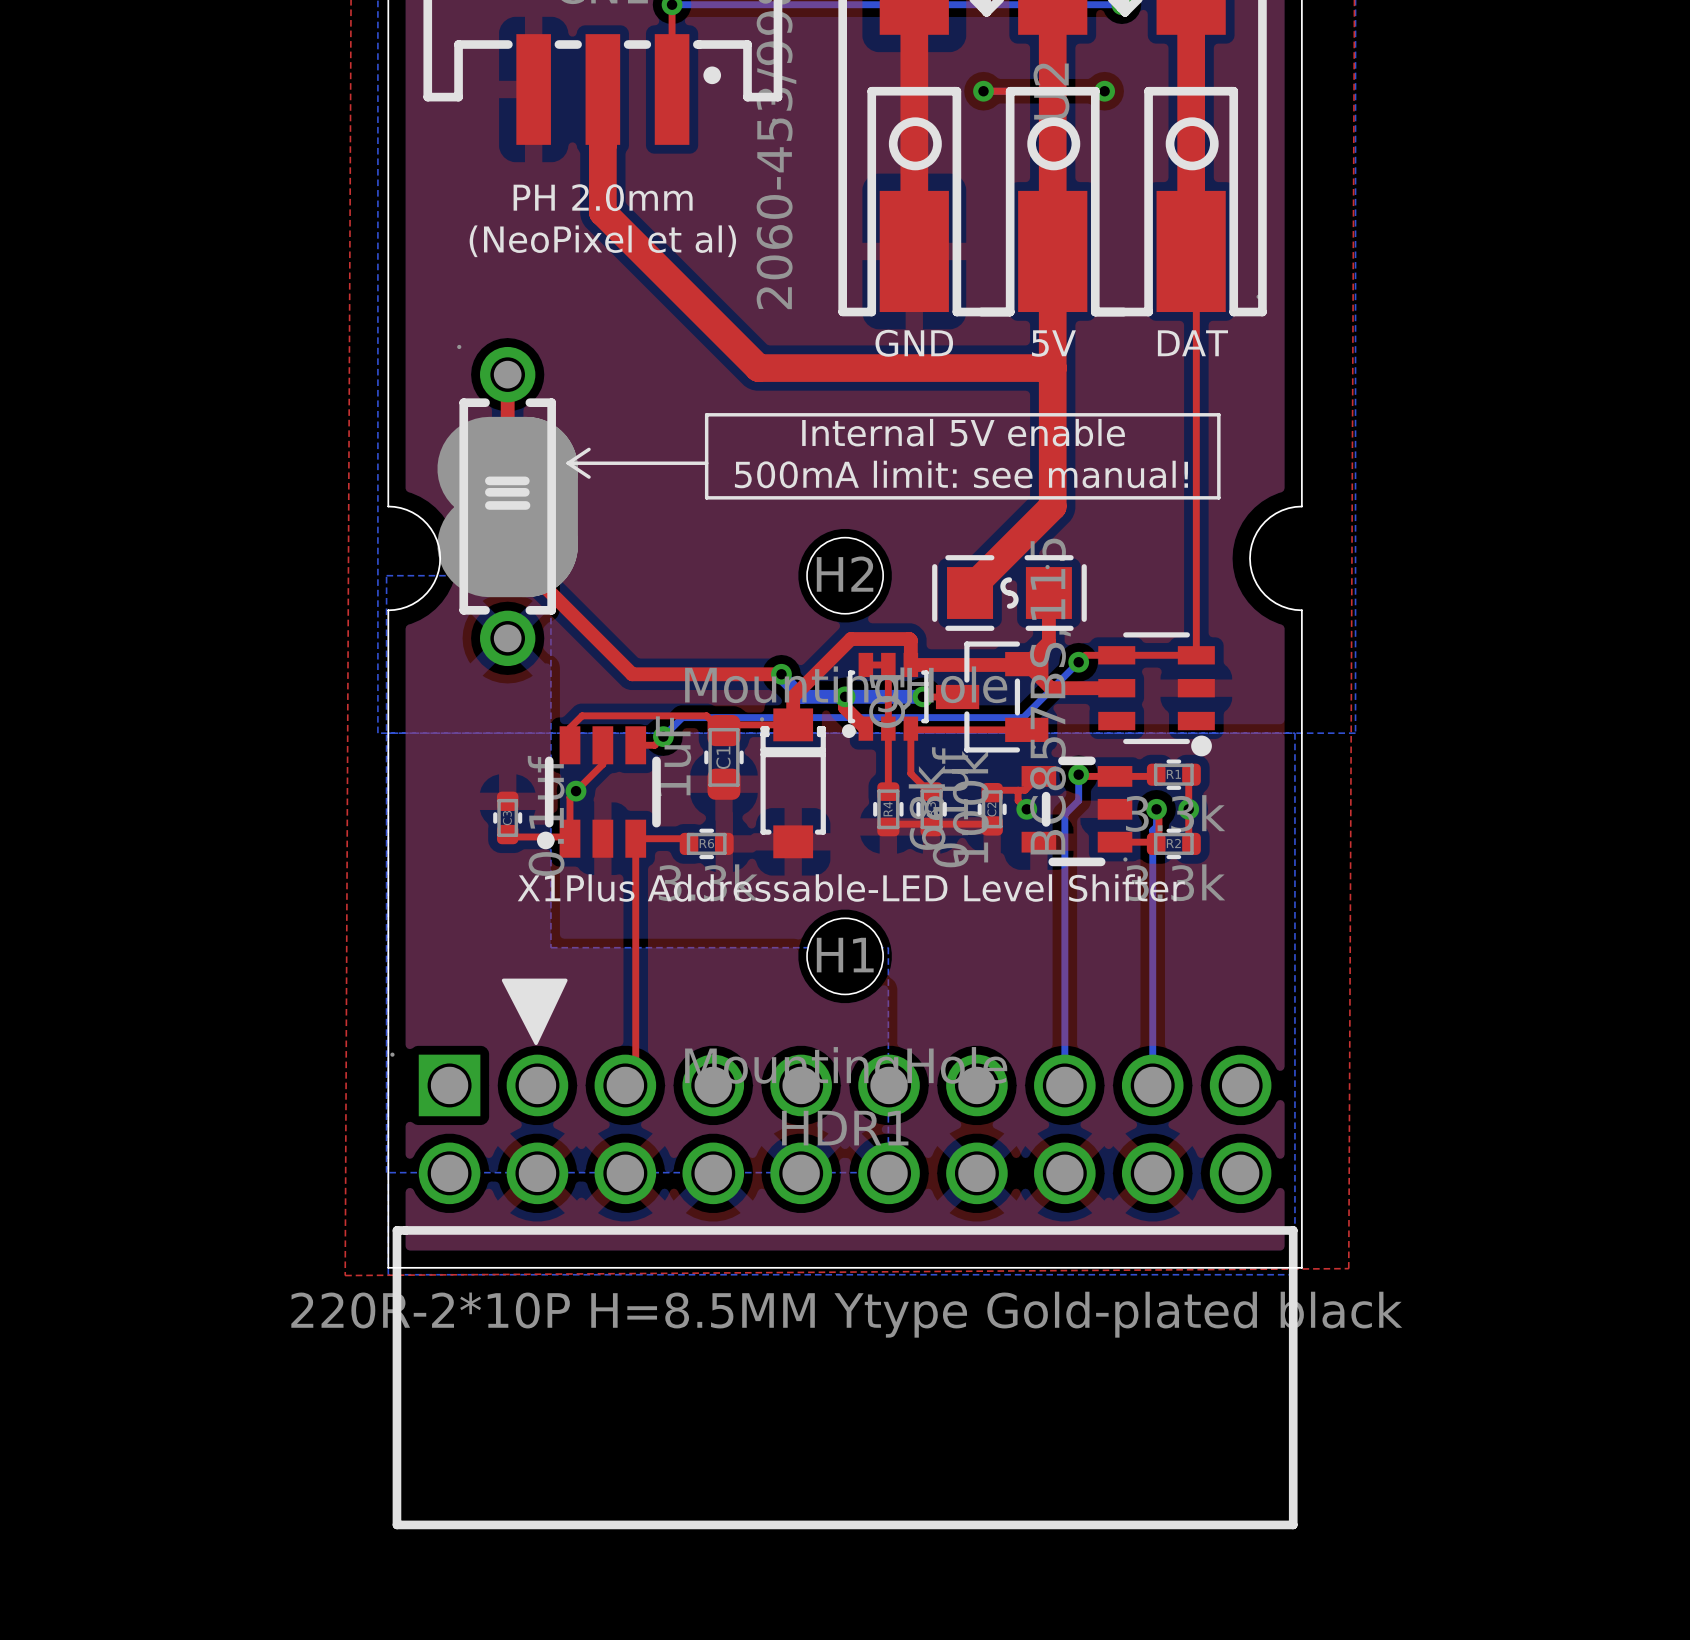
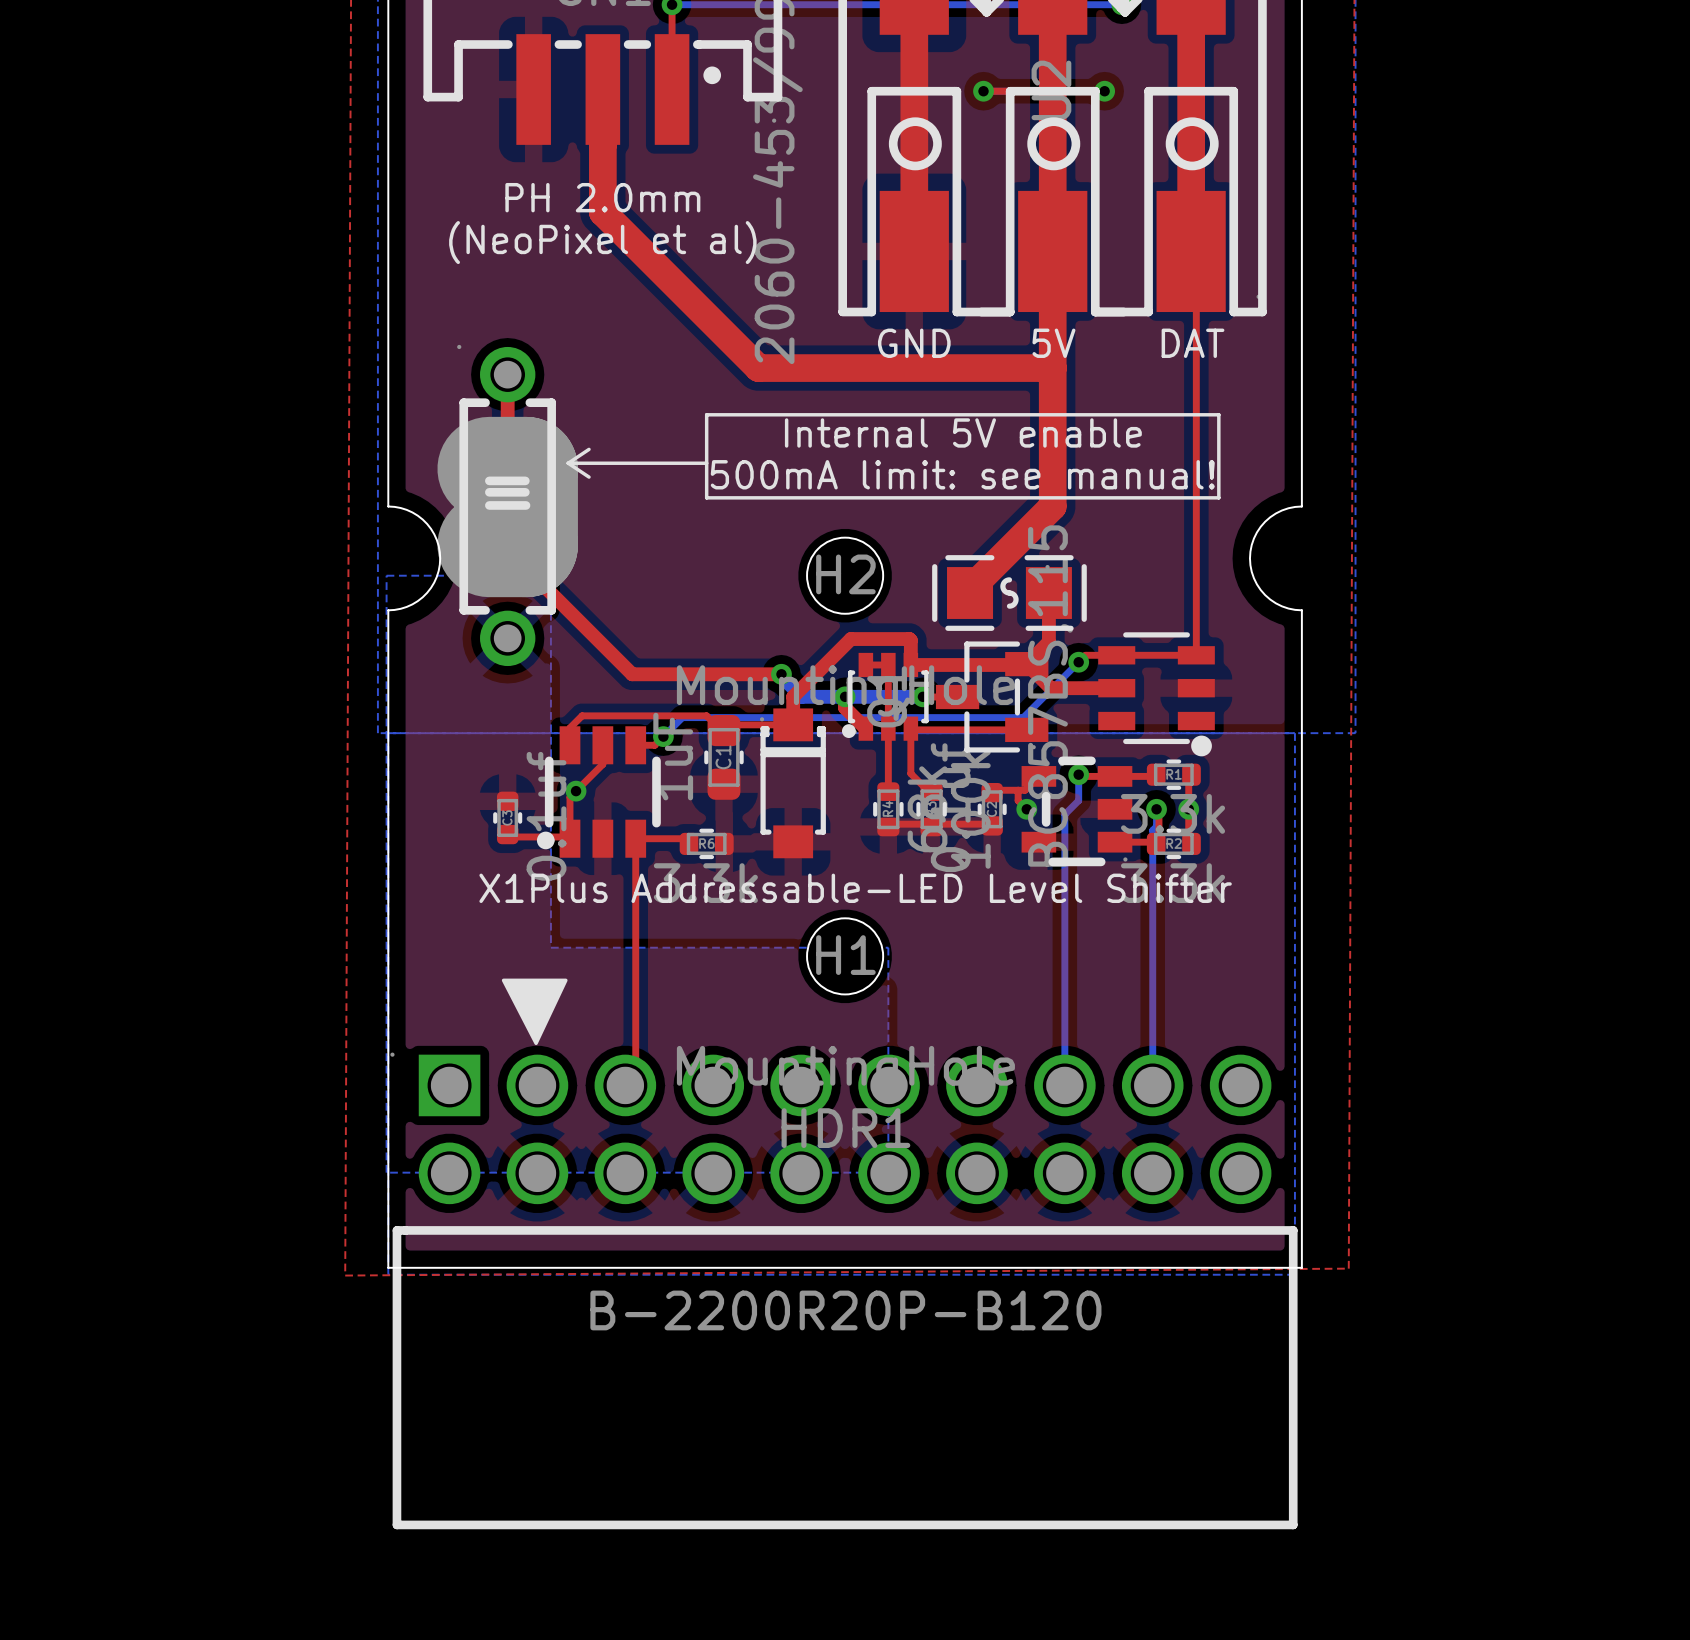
HDR1 value: 220R-2*10P H=8.5MM Ytype Gold-plated black (846, 1314) -> B-2200R20P-B120 (845, 1310)

